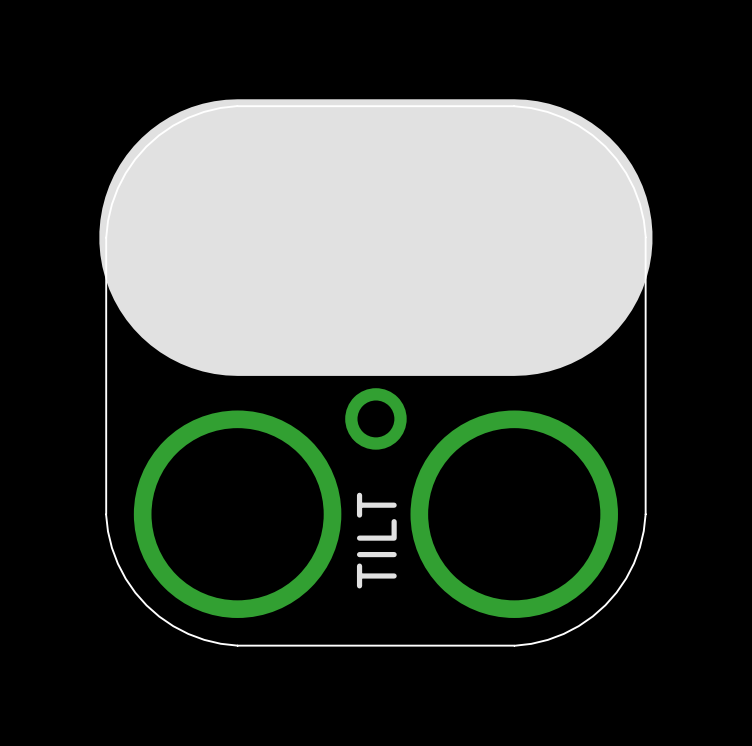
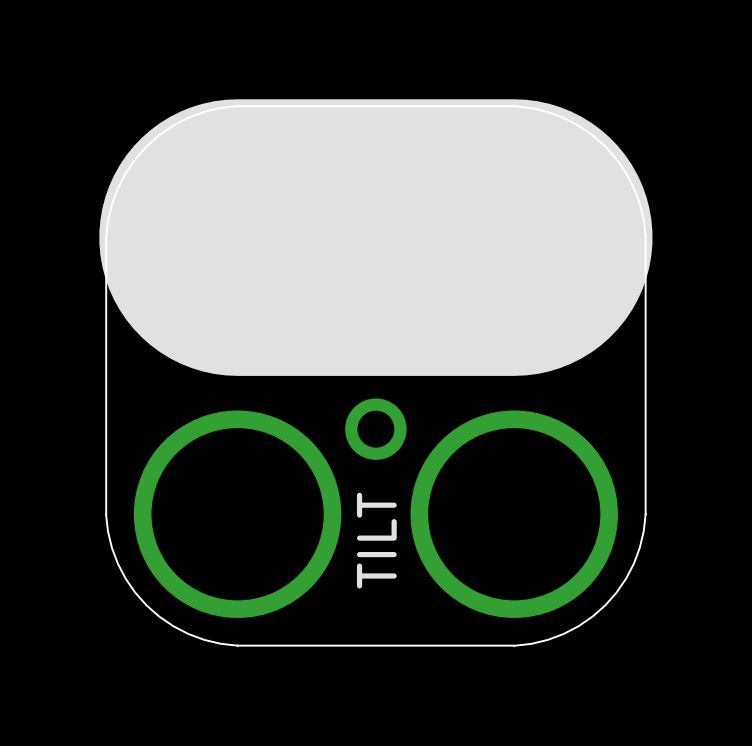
part footprint: [99, 99, 653, 647] -> [99, 99, 653, 647]

